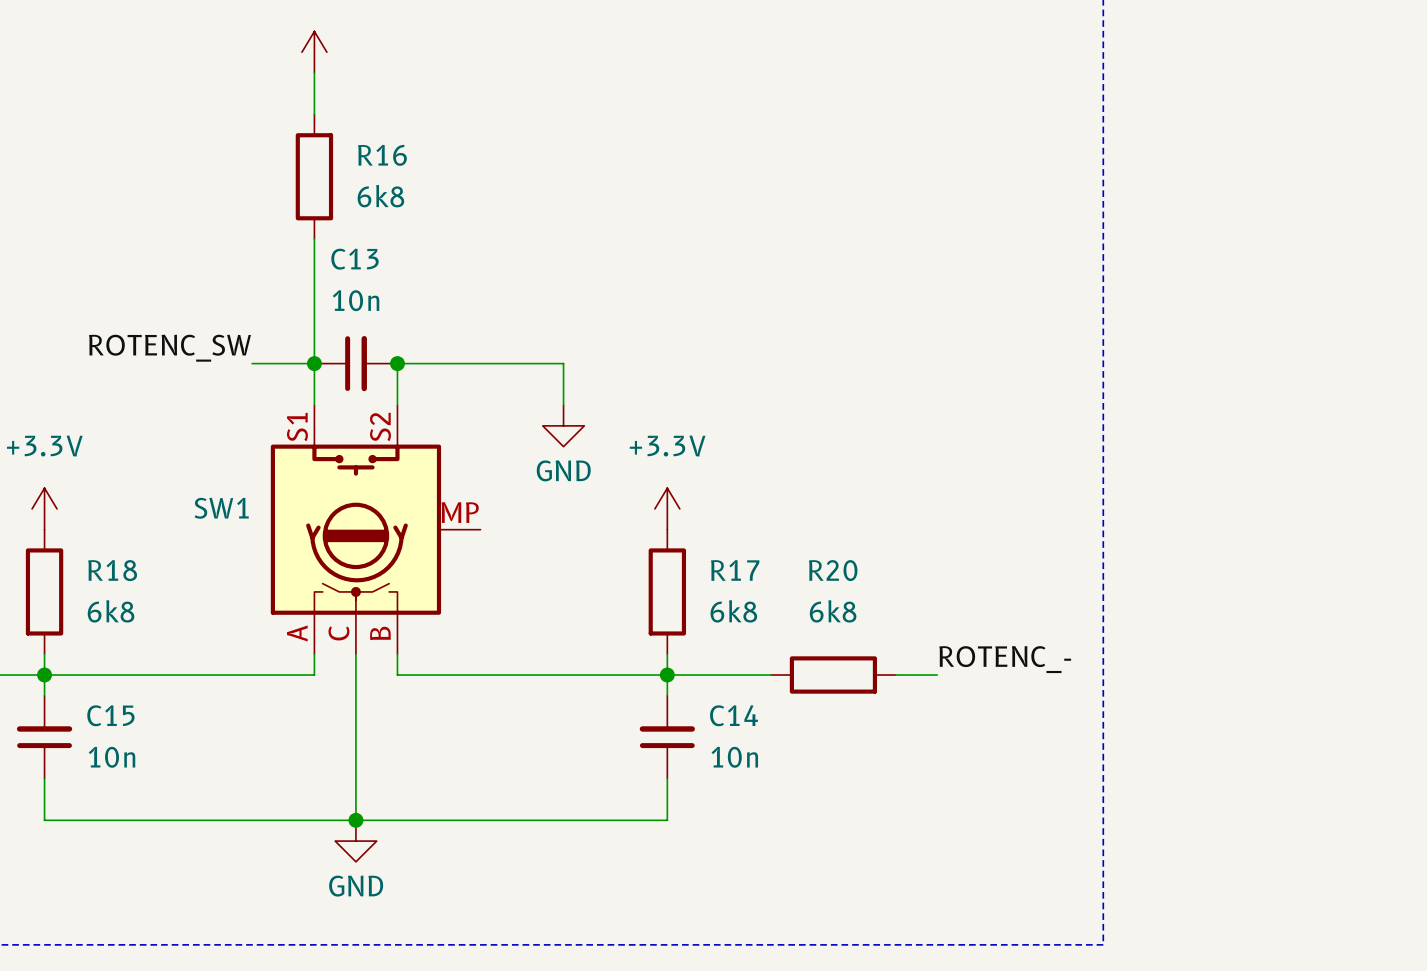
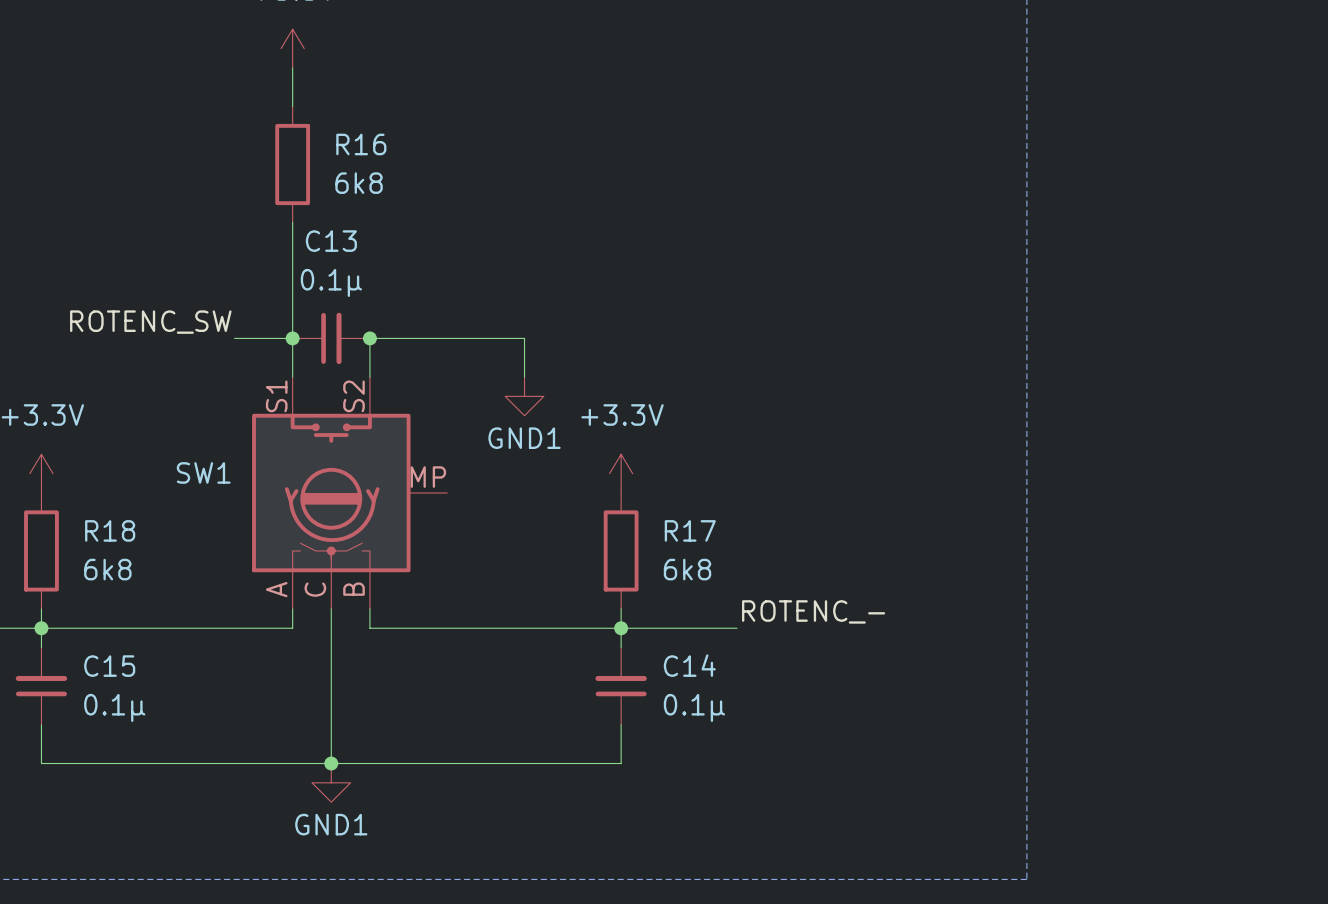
C13 value: 10n (356, 300) -> 0.1µ (331, 282)
power symbol: GND (563, 425) -> GND1 (524, 396)
label position: ROTENC_- (1005, 659) -> ROTENC_- (813, 611)
R20: 6k8 (833, 675) -> none
wire: (895, 675) (937, 675) -> none
C15 value: 10n (111, 757) -> 0.1µ (114, 707)
C14 value: 10n (734, 757) -> 0.1µ (694, 707)
power symbol: GND (355, 841) -> GND1 (331, 782)

